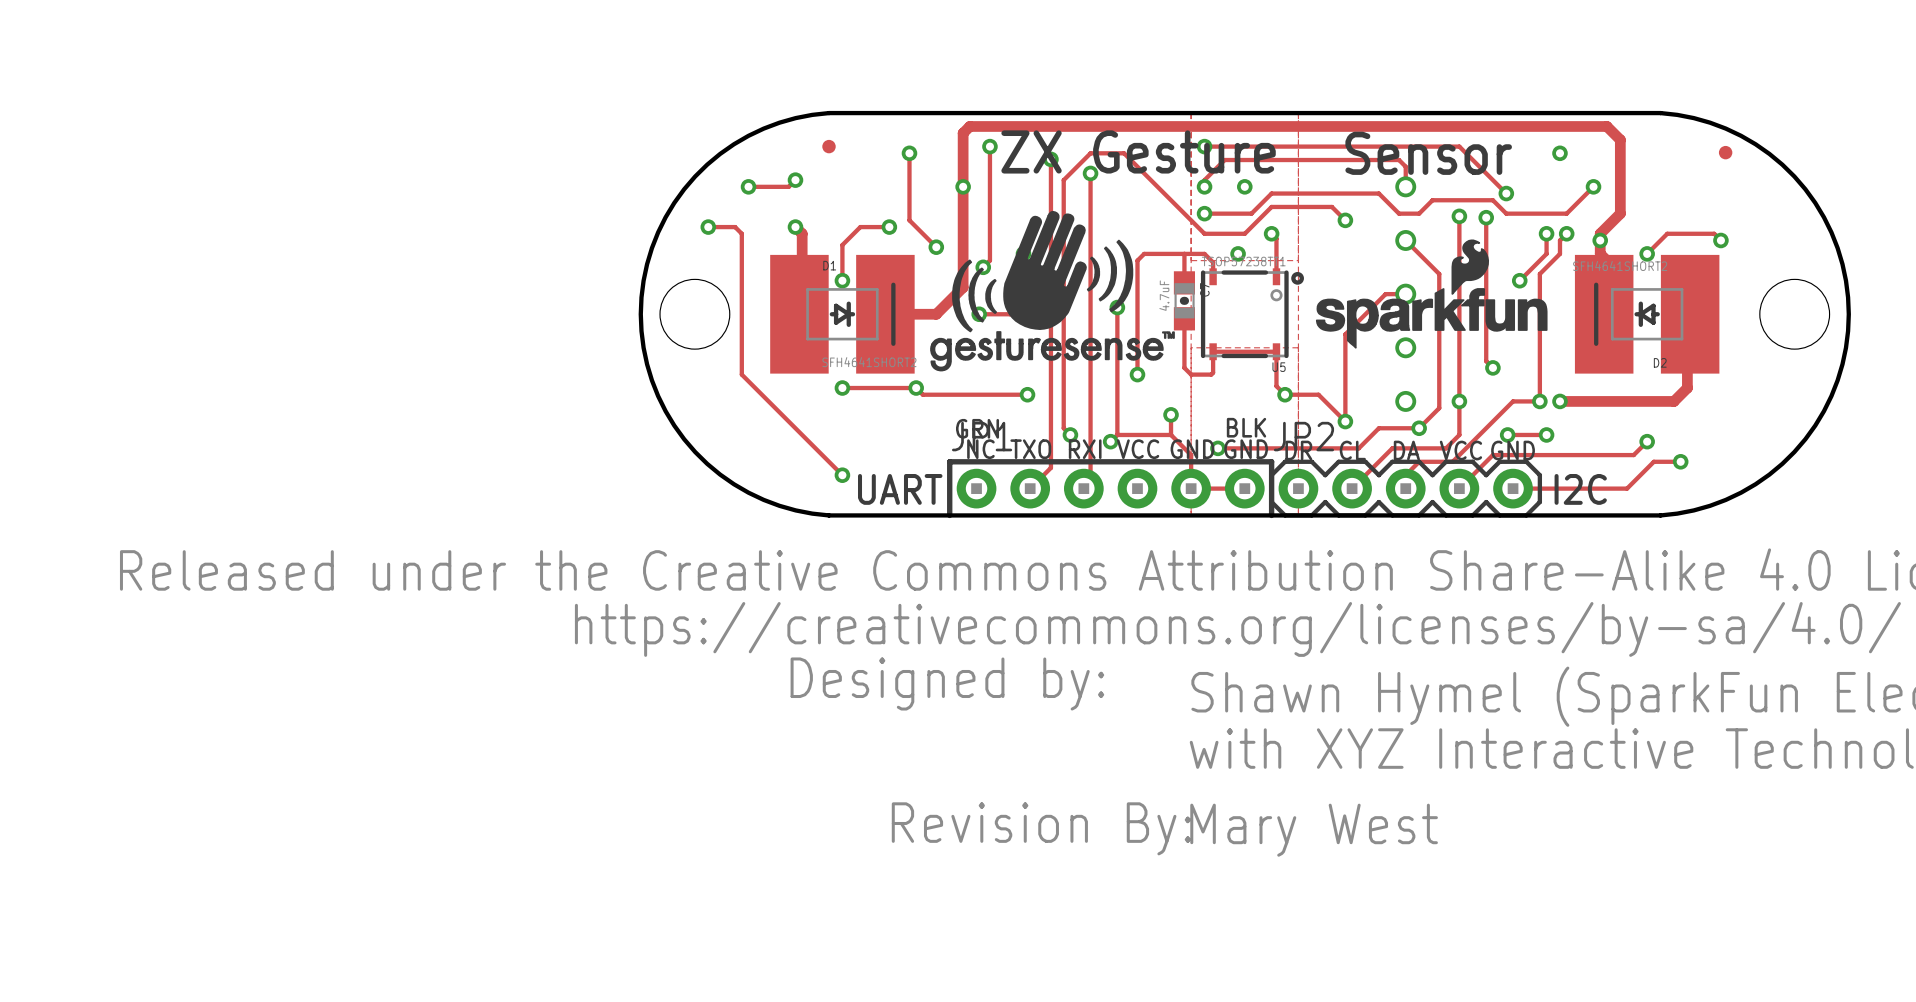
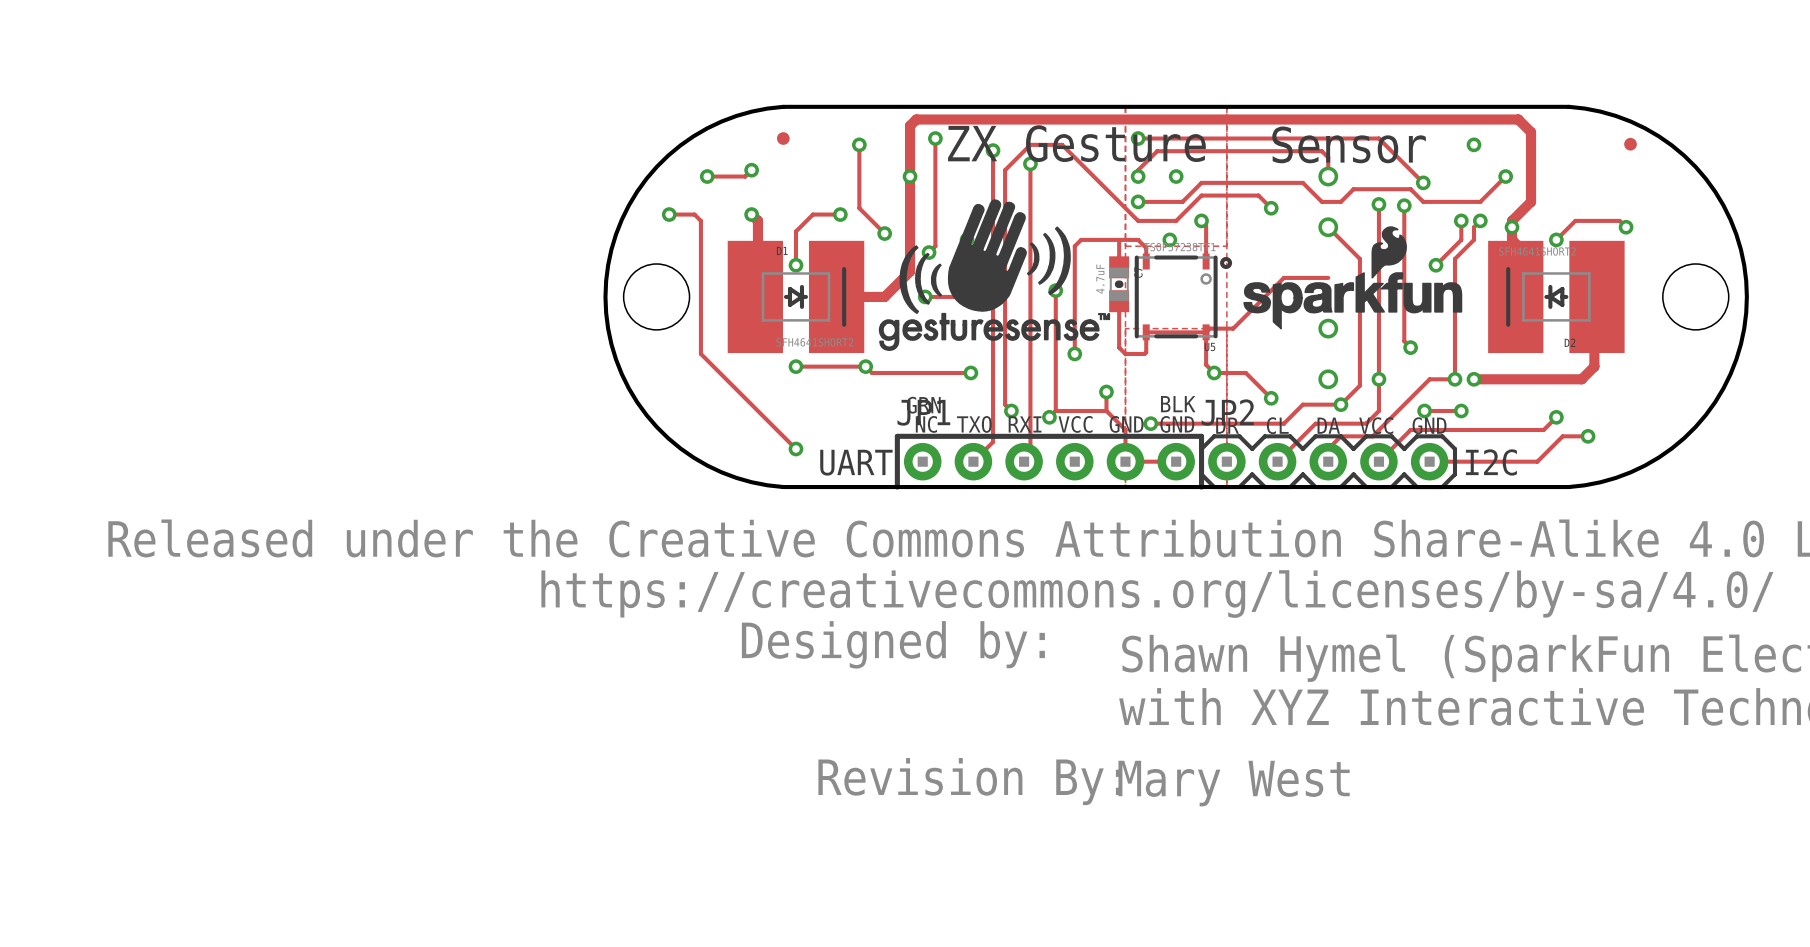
track: (1385, 294) (1345, 334) (1345, 421) -> (1309, 277) (1283, 277) (1233, 328) (1209, 328) (1206, 332)
via: (1405, 294) -> none

